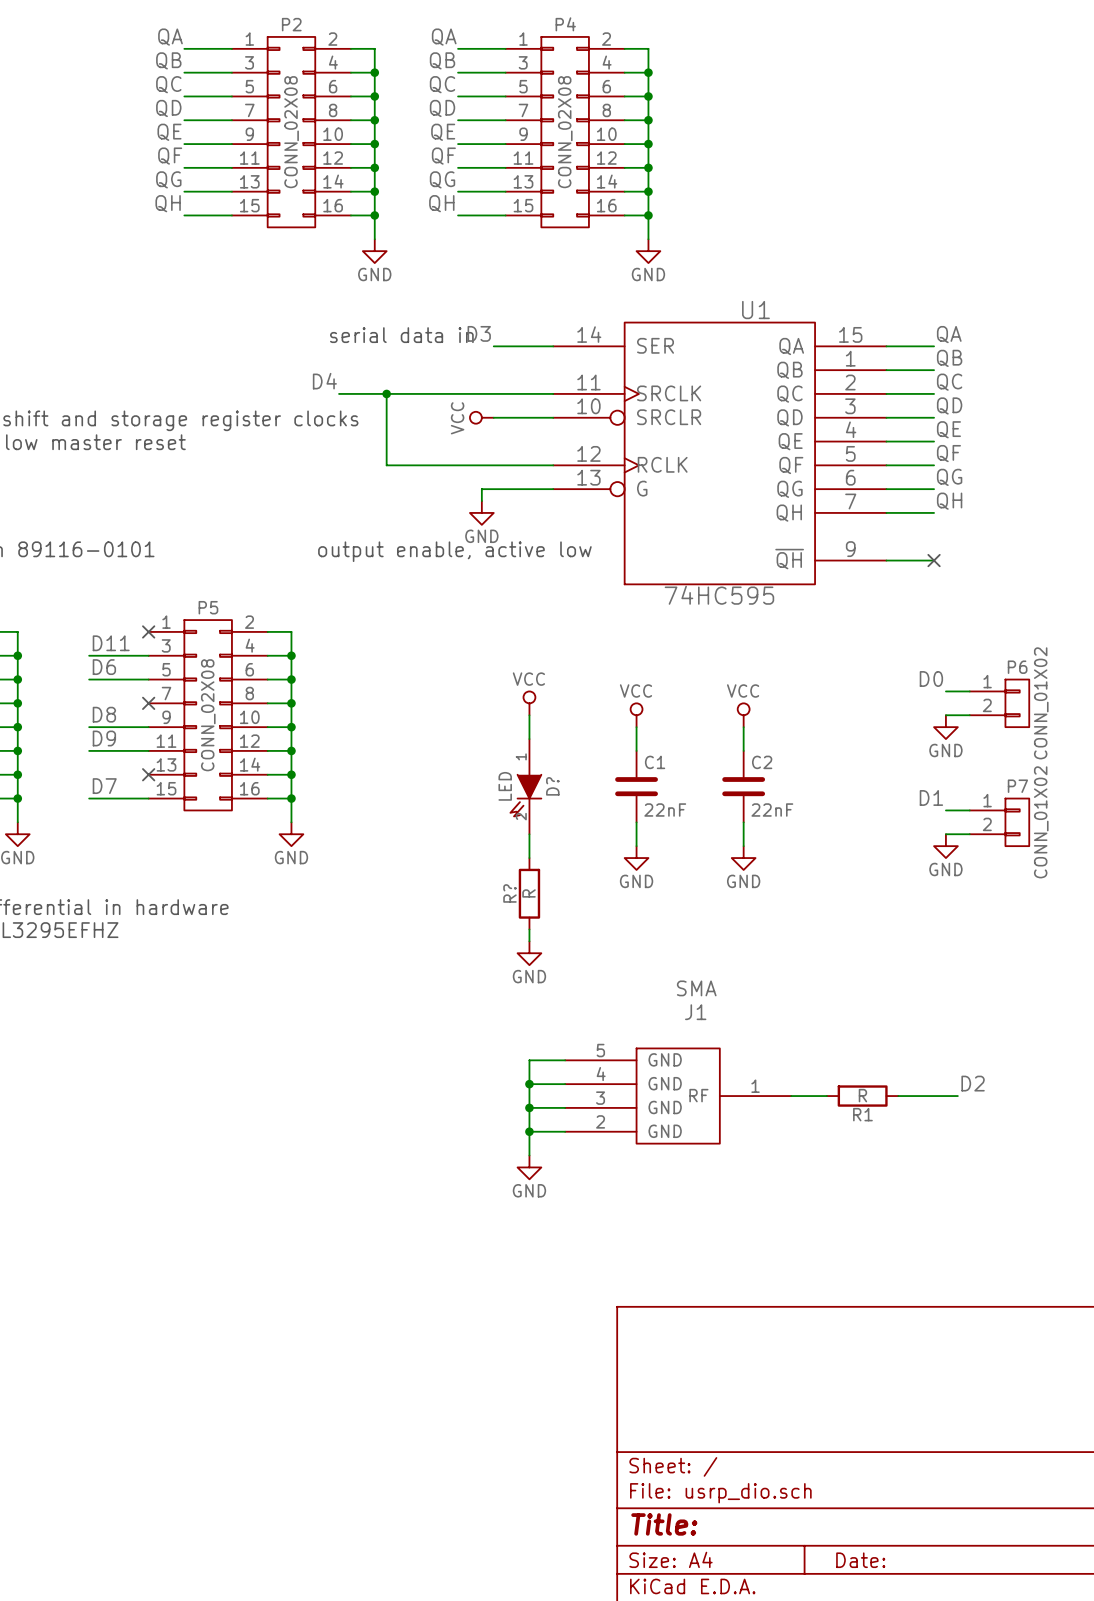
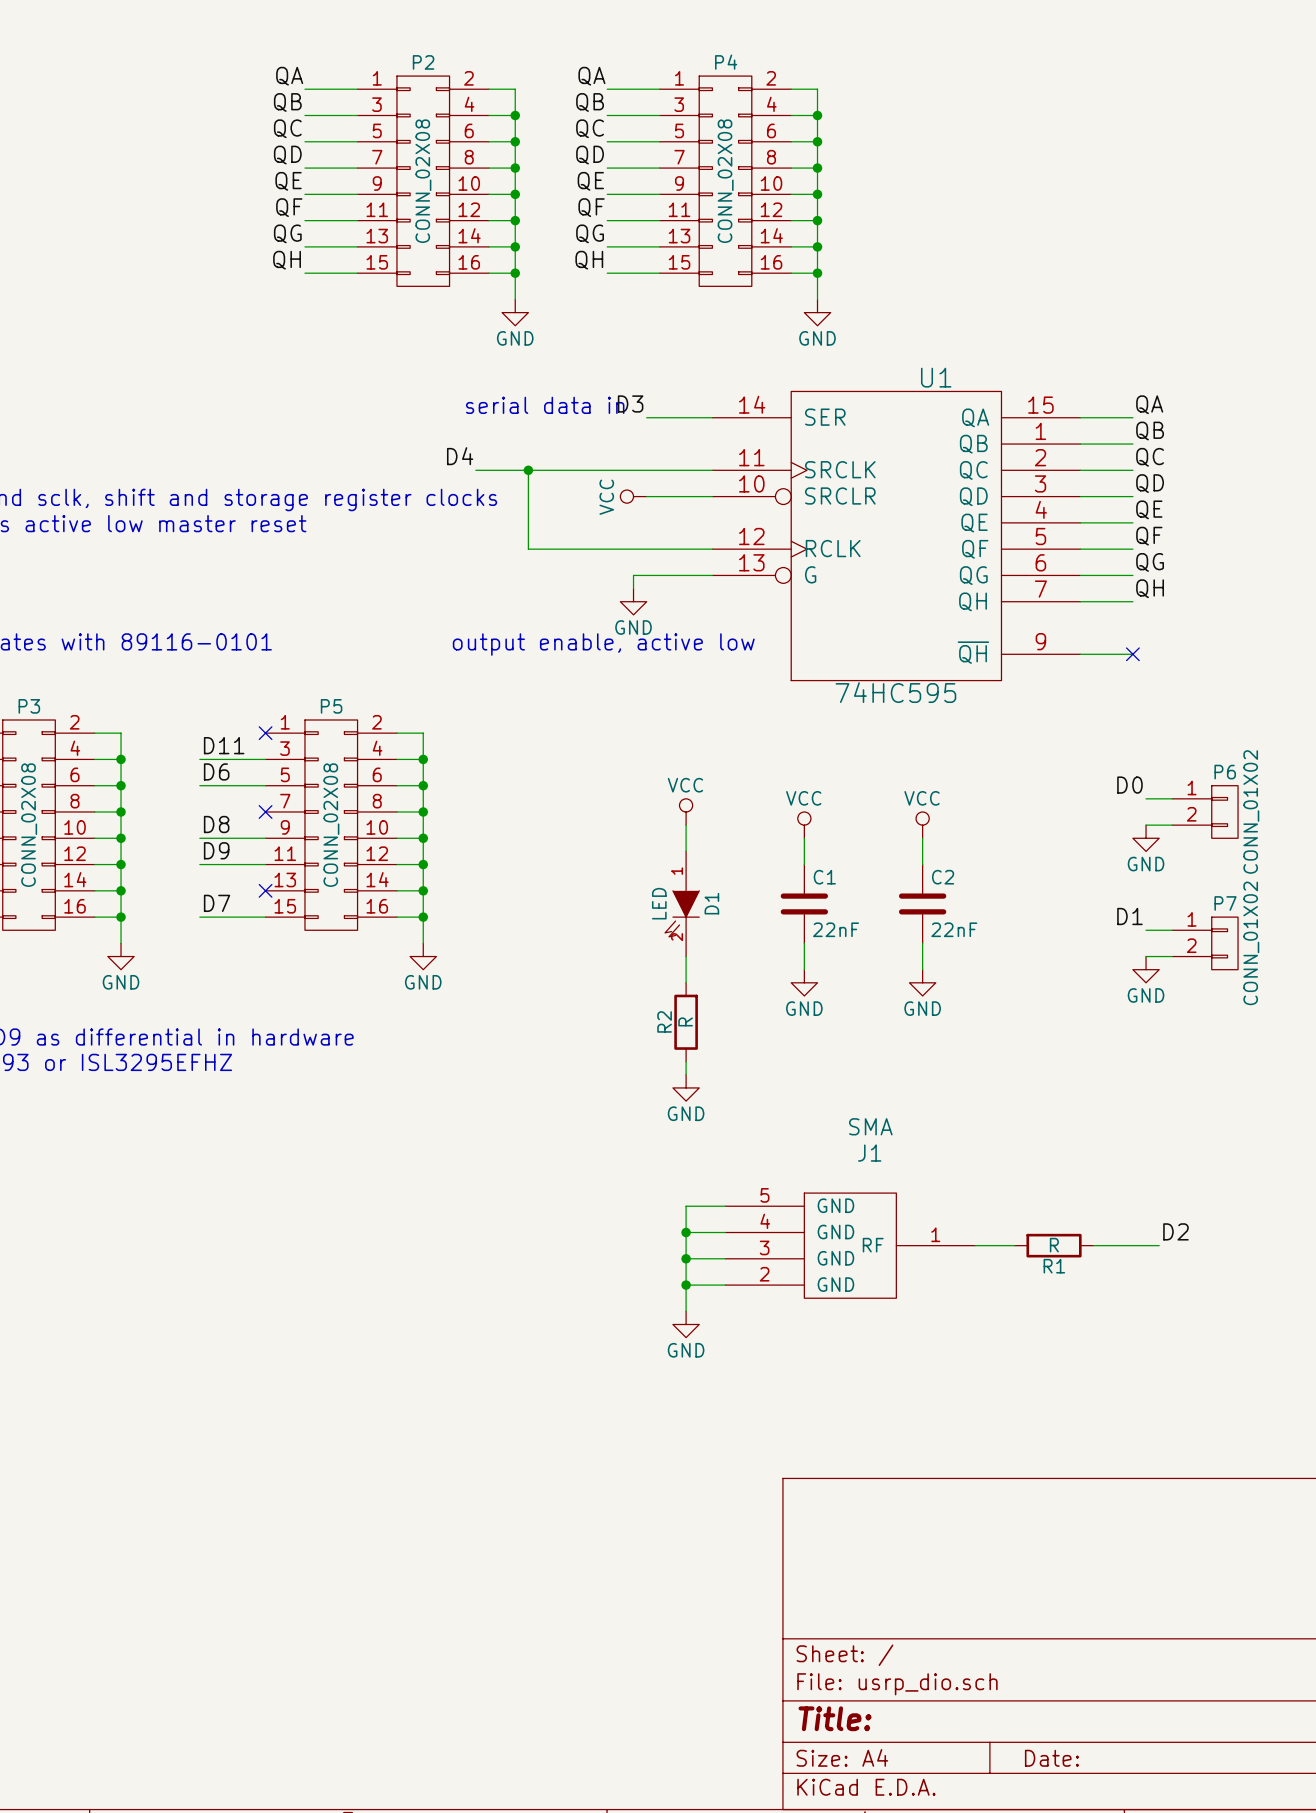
D? name: D? (552, 786) -> D1 (711, 903)
R? name: R? (509, 893) -> R2 (664, 1021)

